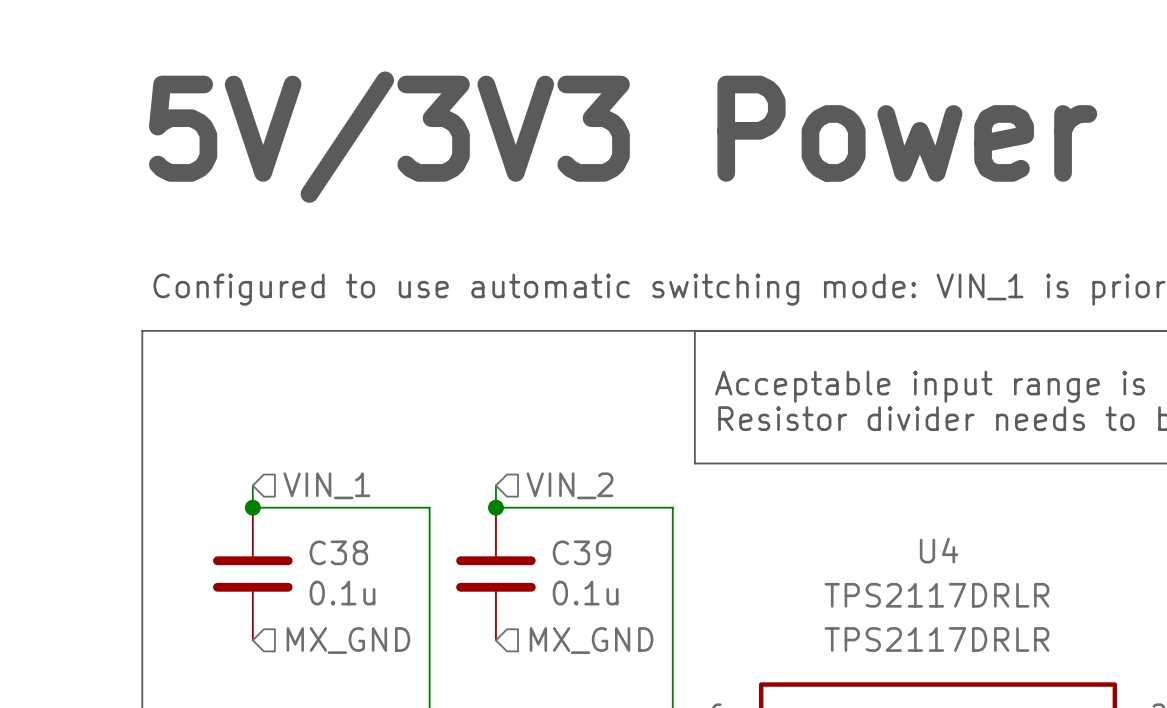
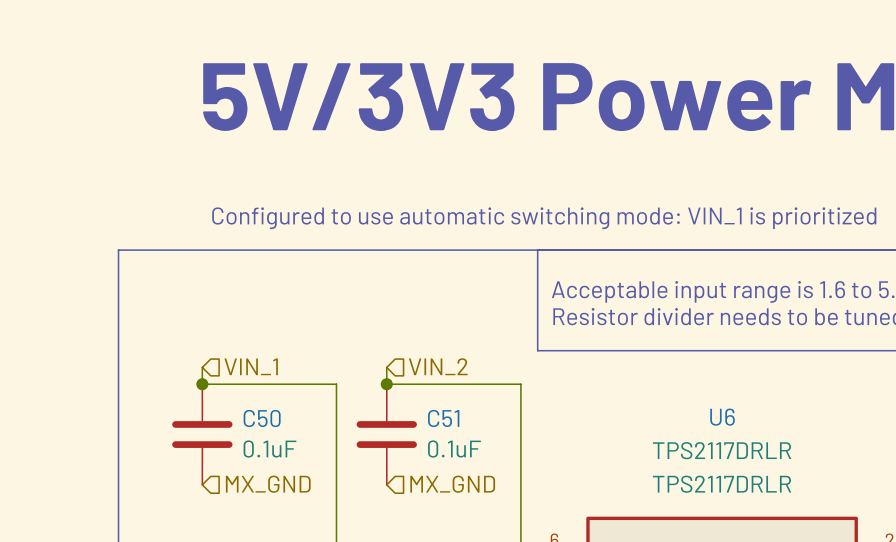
U4 name: U4 (939, 550) -> U6 (722, 417)
C38 name: C38 (338, 552) -> C50 (262, 418)
C39 name: C39 (581, 552) -> C51 (443, 418)
C38 value: 0.1u (342, 593) -> 0.1uF (270, 449)
C39 value: 0.1u (585, 593) -> 0.1uF (454, 449)

